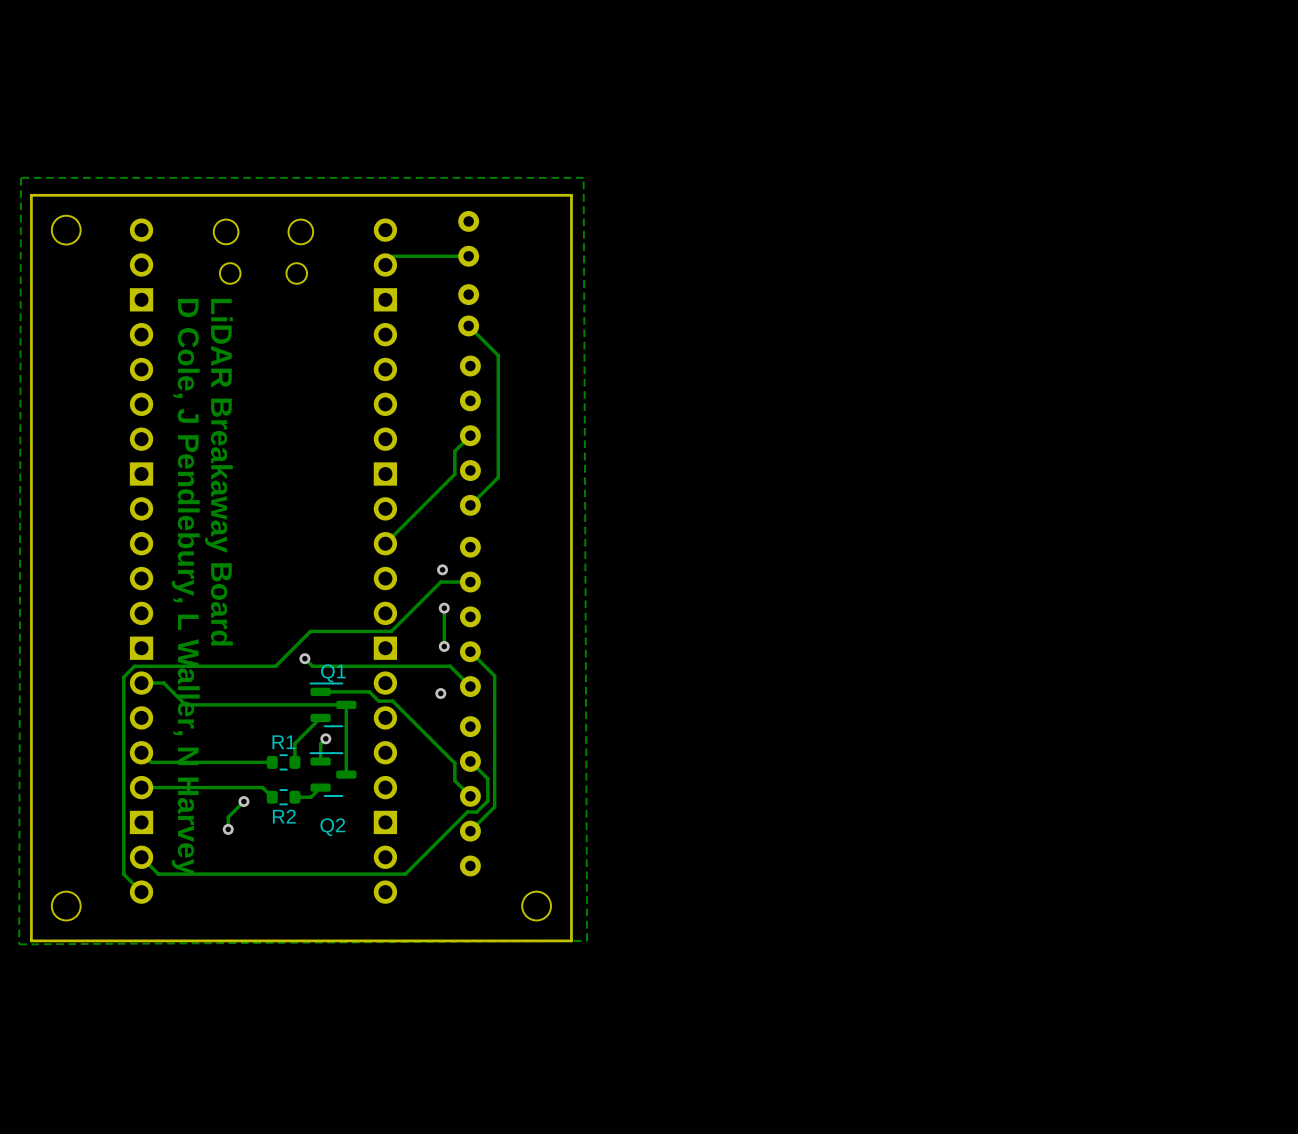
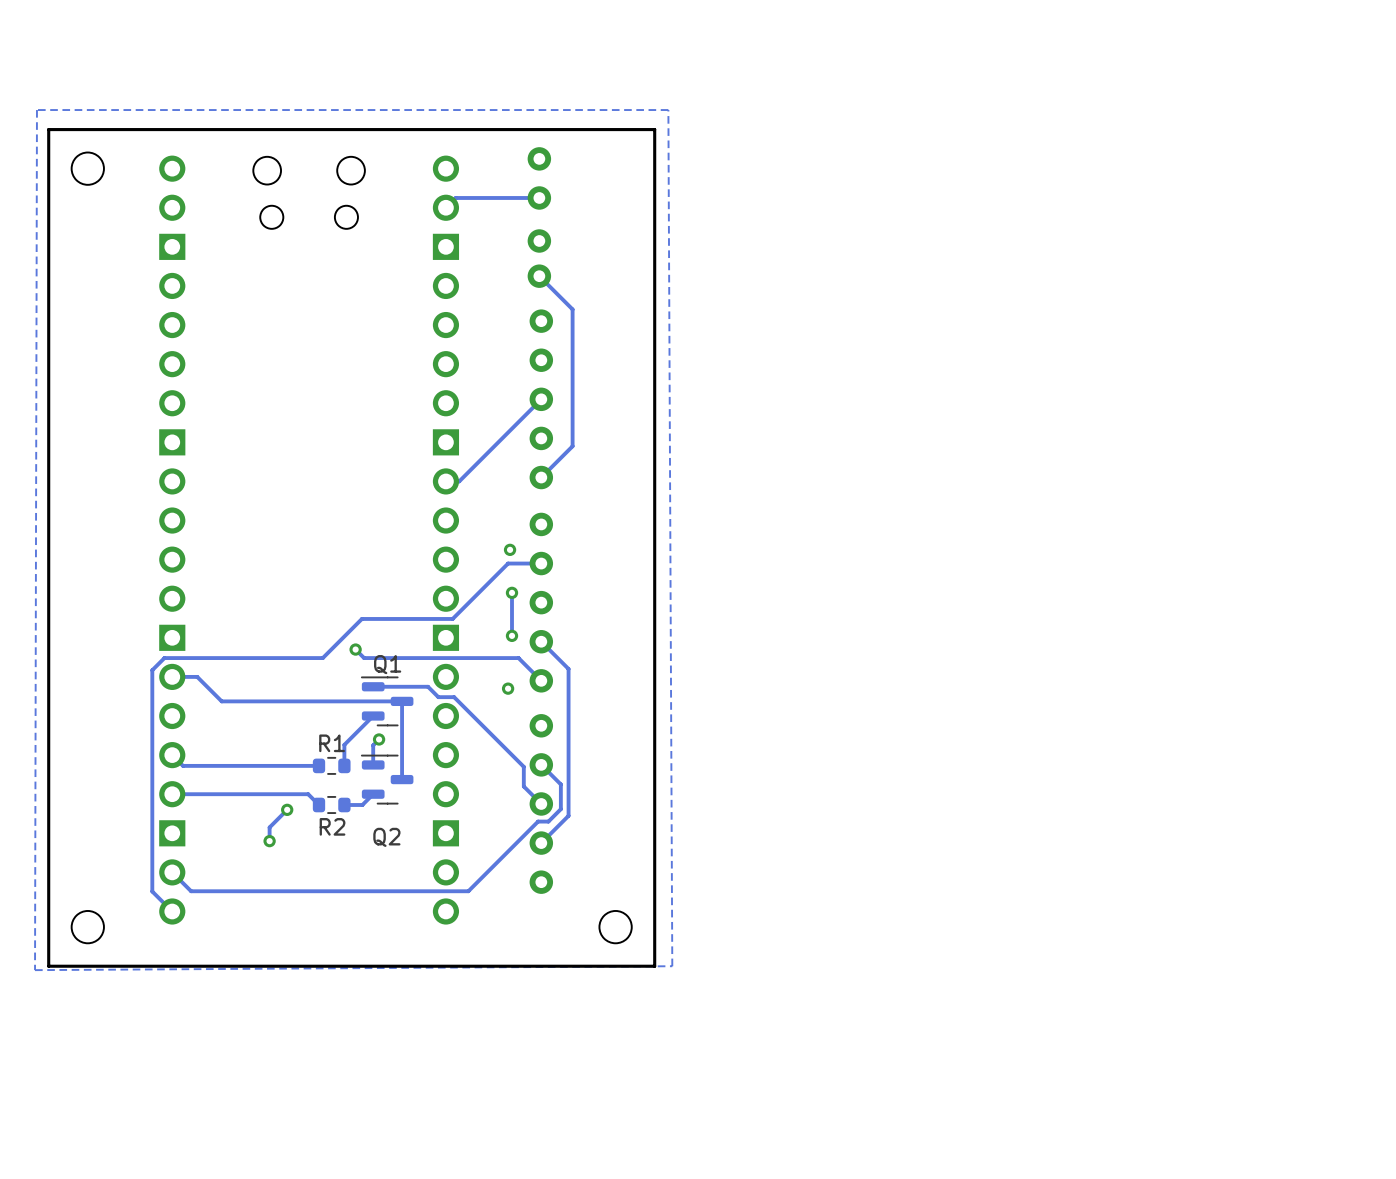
track: (454, 451) (454, 474) (385, 543) -> (523, 416) (459, 481) (445, 481)
text: LiDAR Breakaway Board (218, 472) -> none
text: D Cole, J Pendlebury, L Waller, N Harvey (185, 587) -> none

